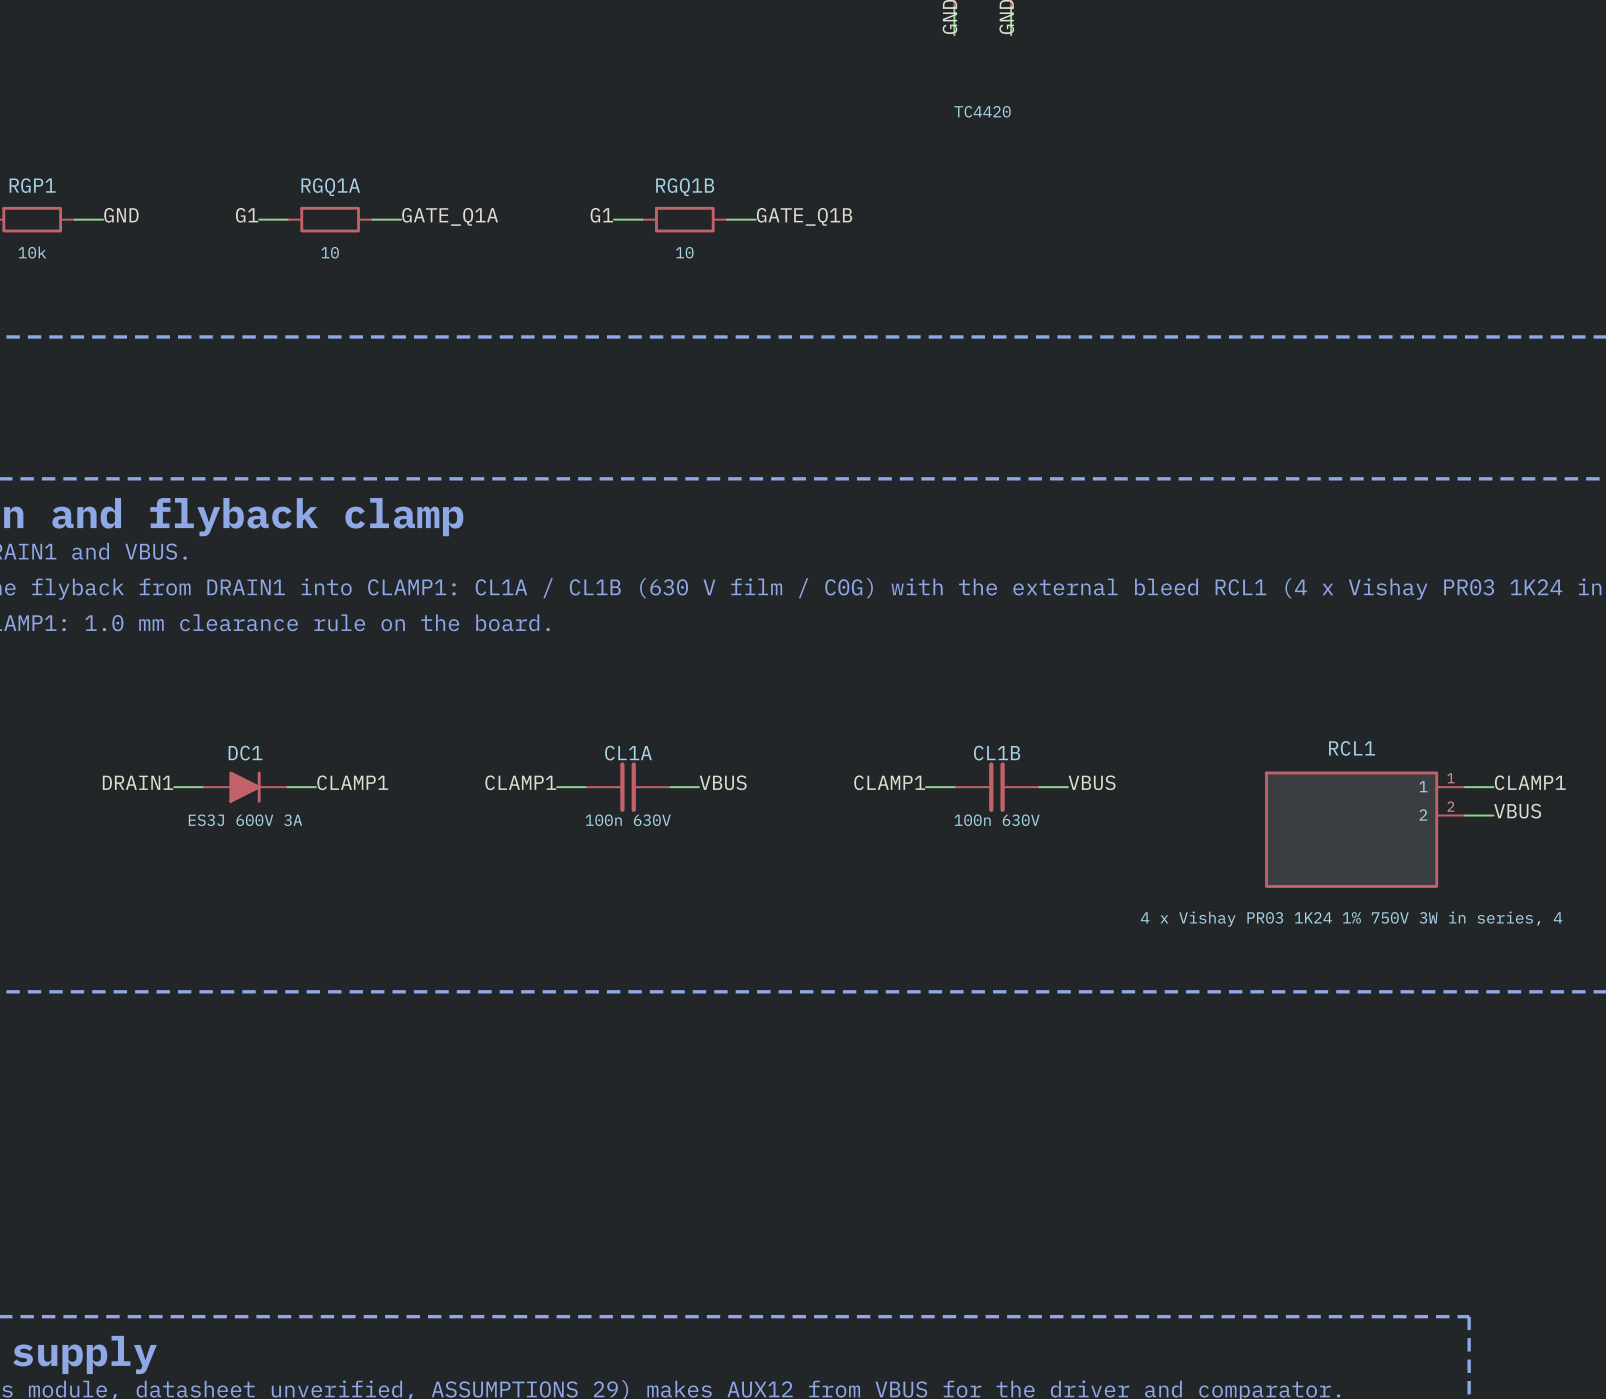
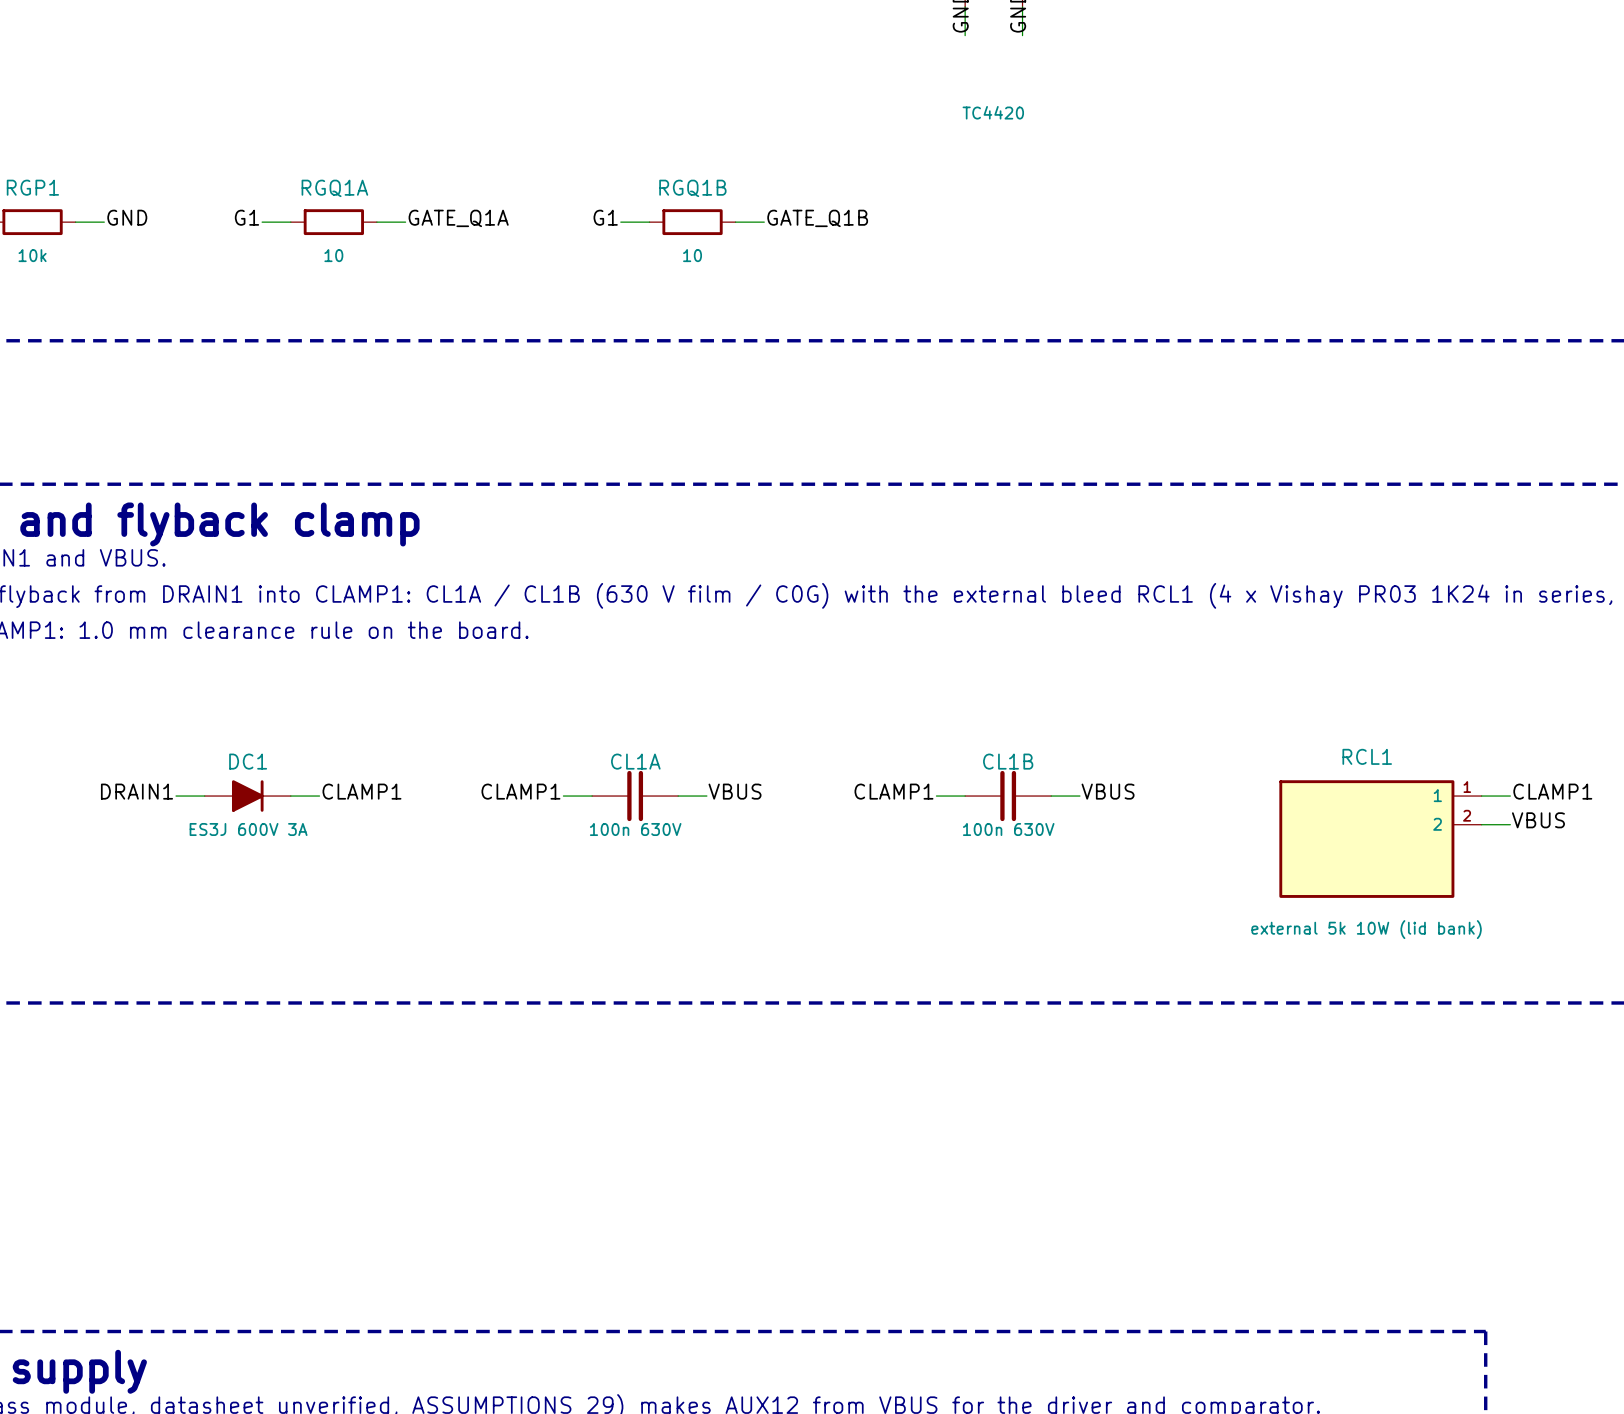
RCL1 value: 4 x Vishay PR03 1K24 1% 750V 3W in series, 4 (1351, 919) -> external 5k 10W (lid bank) (1366, 929)

